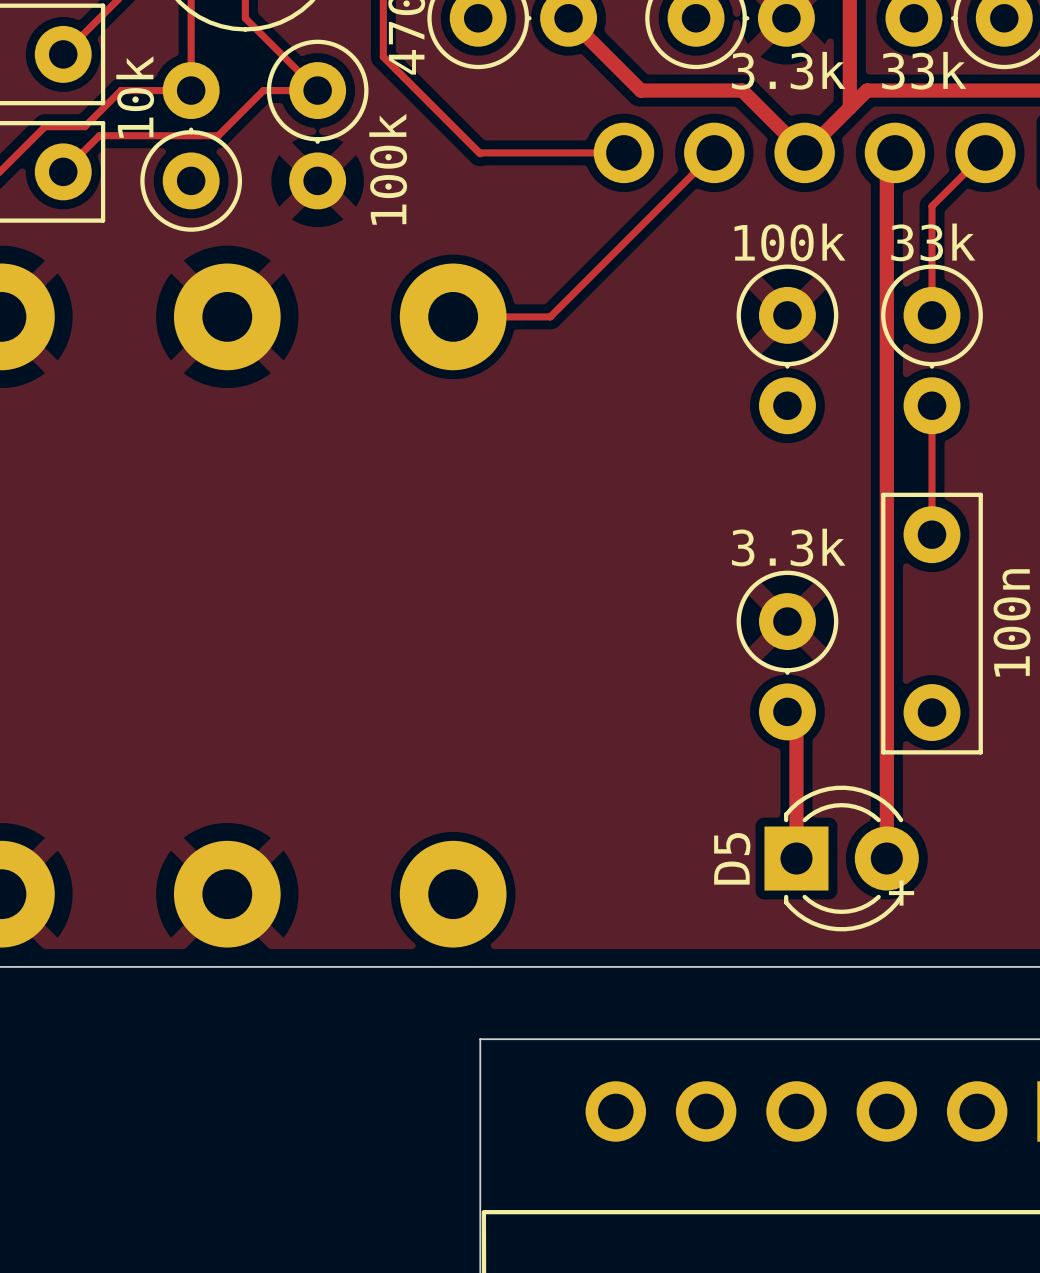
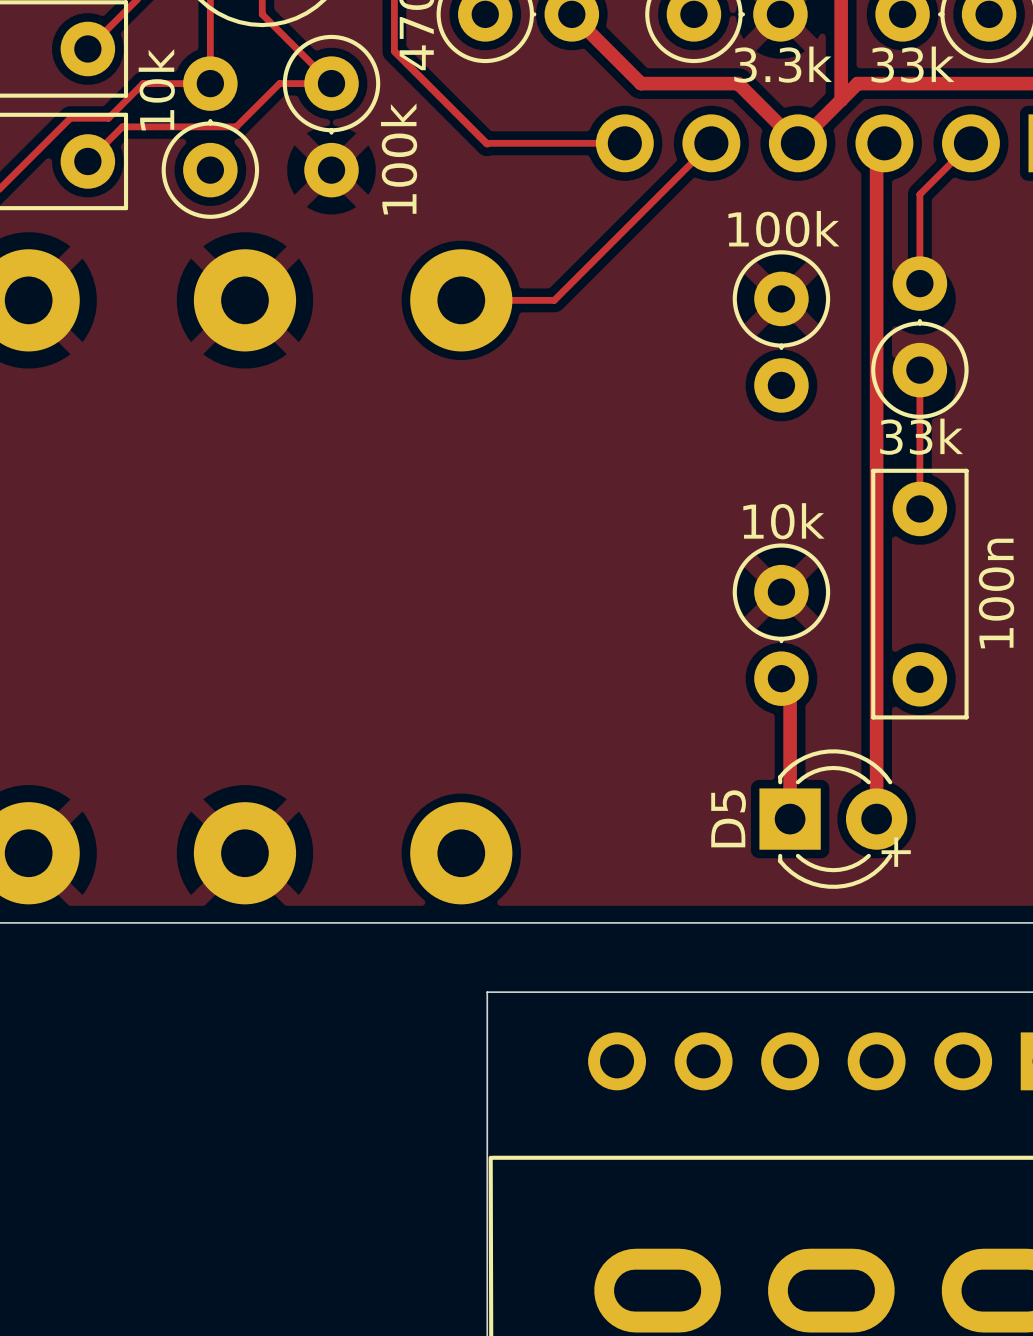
part rotation: 0° (932, 349) -> 180° (919, 337)
part value: 3.3k (788, 547) -> 10k (783, 521)

